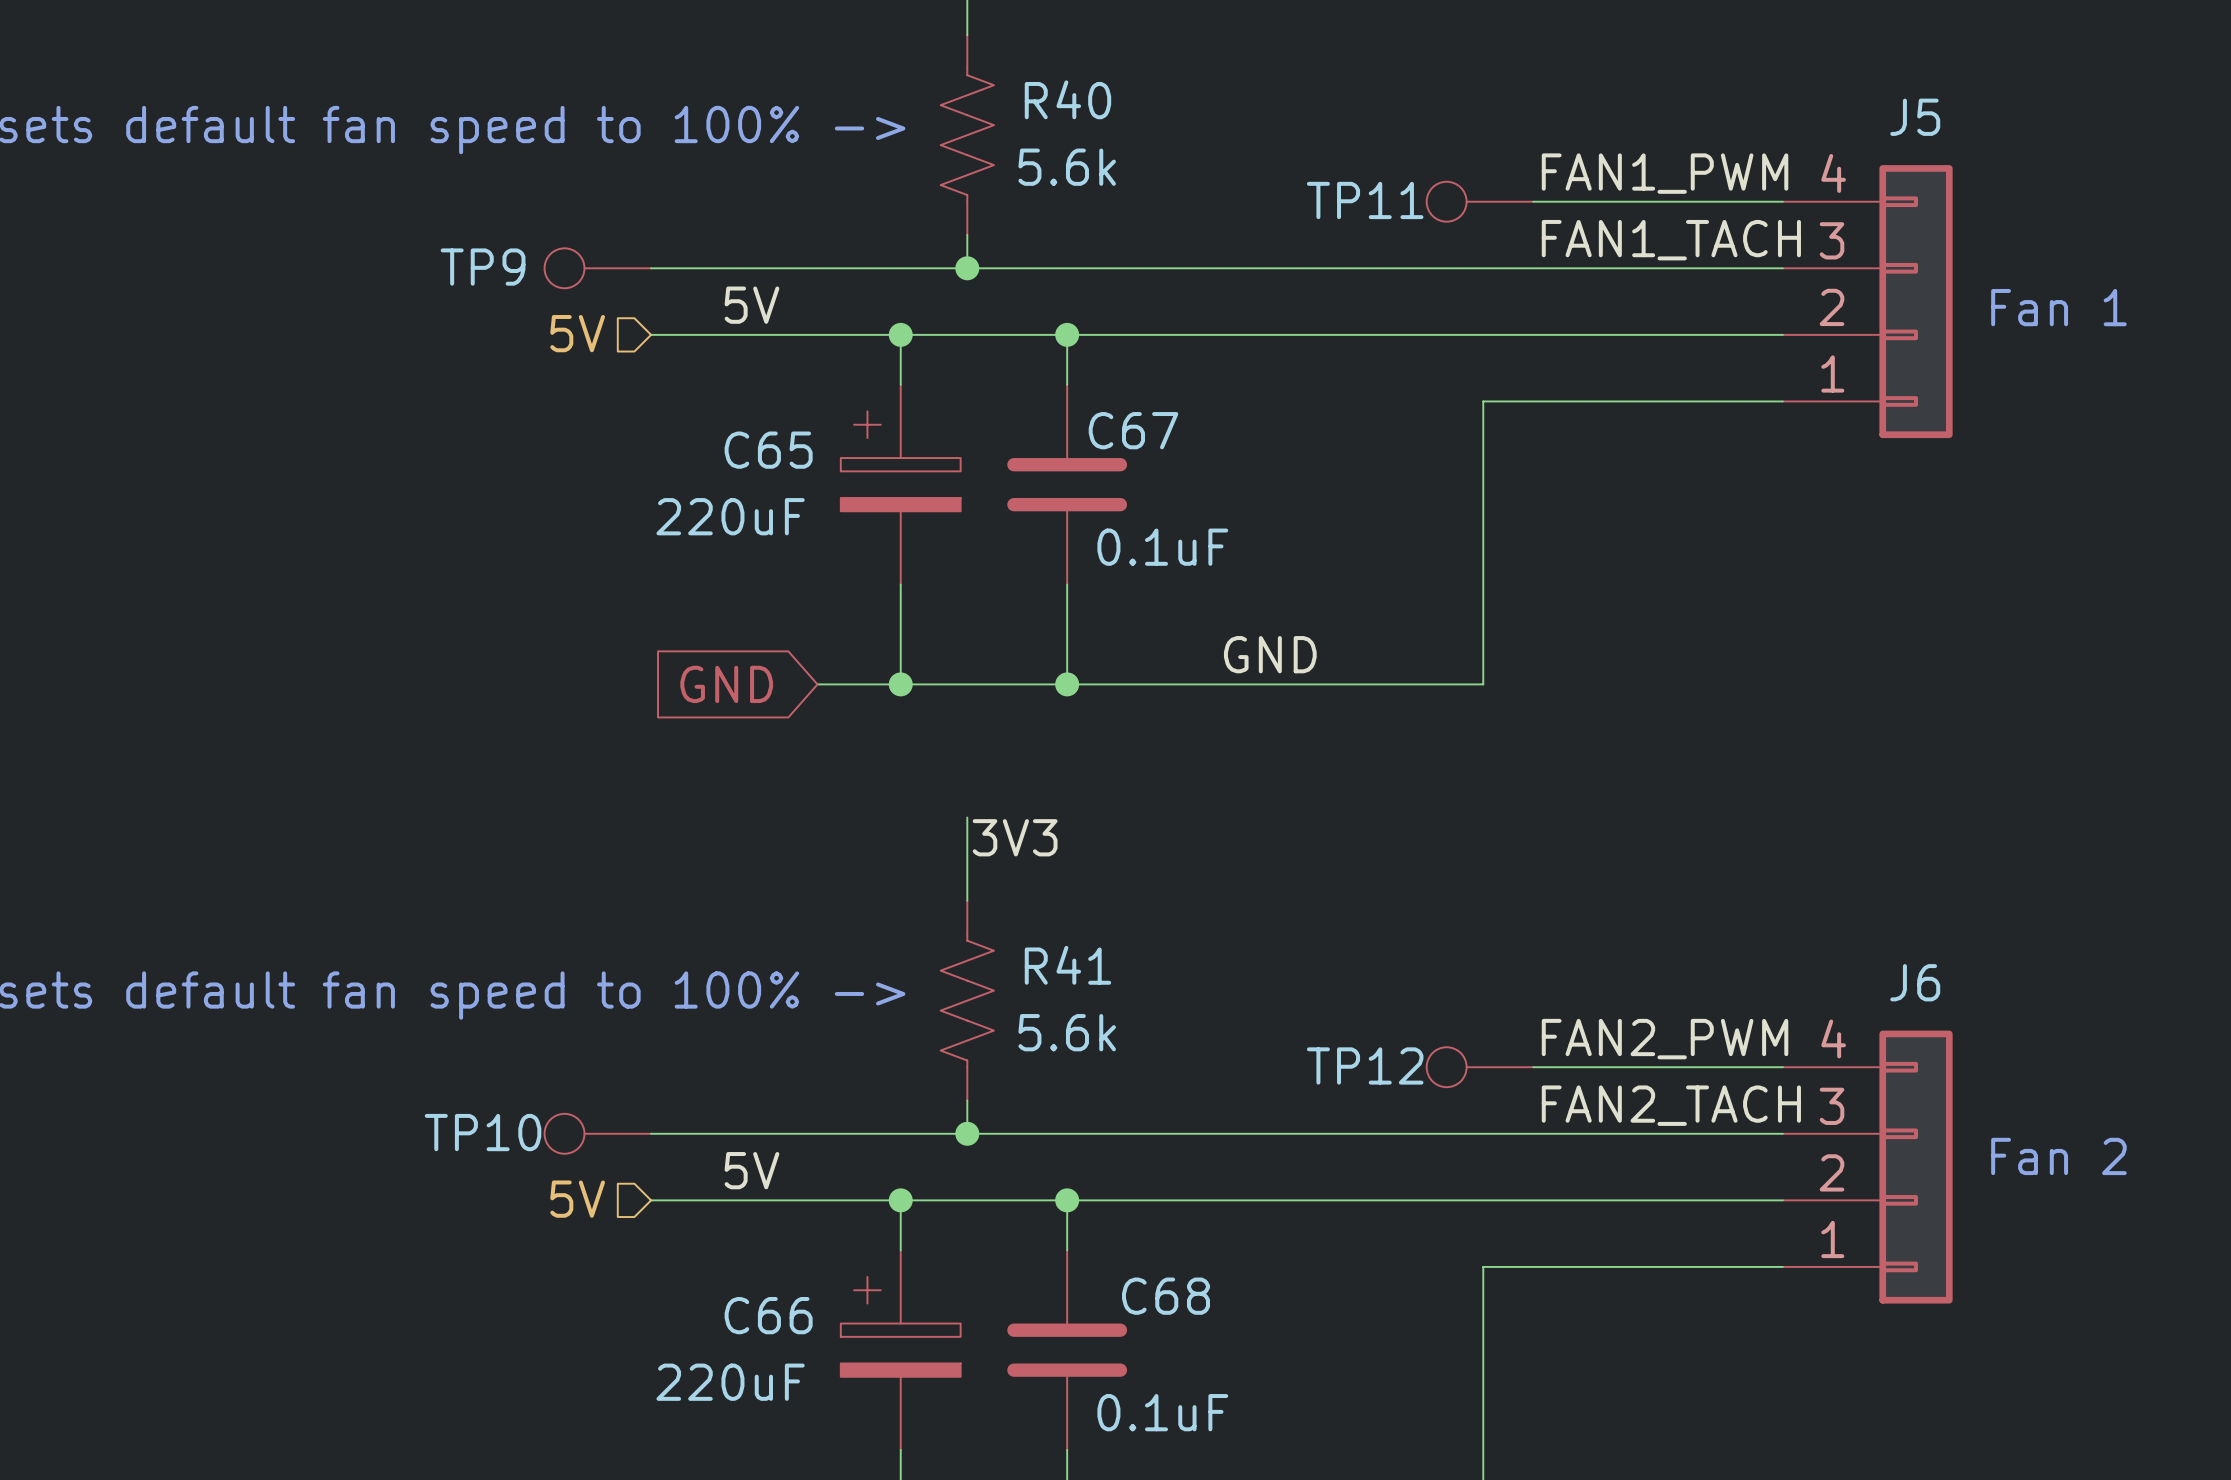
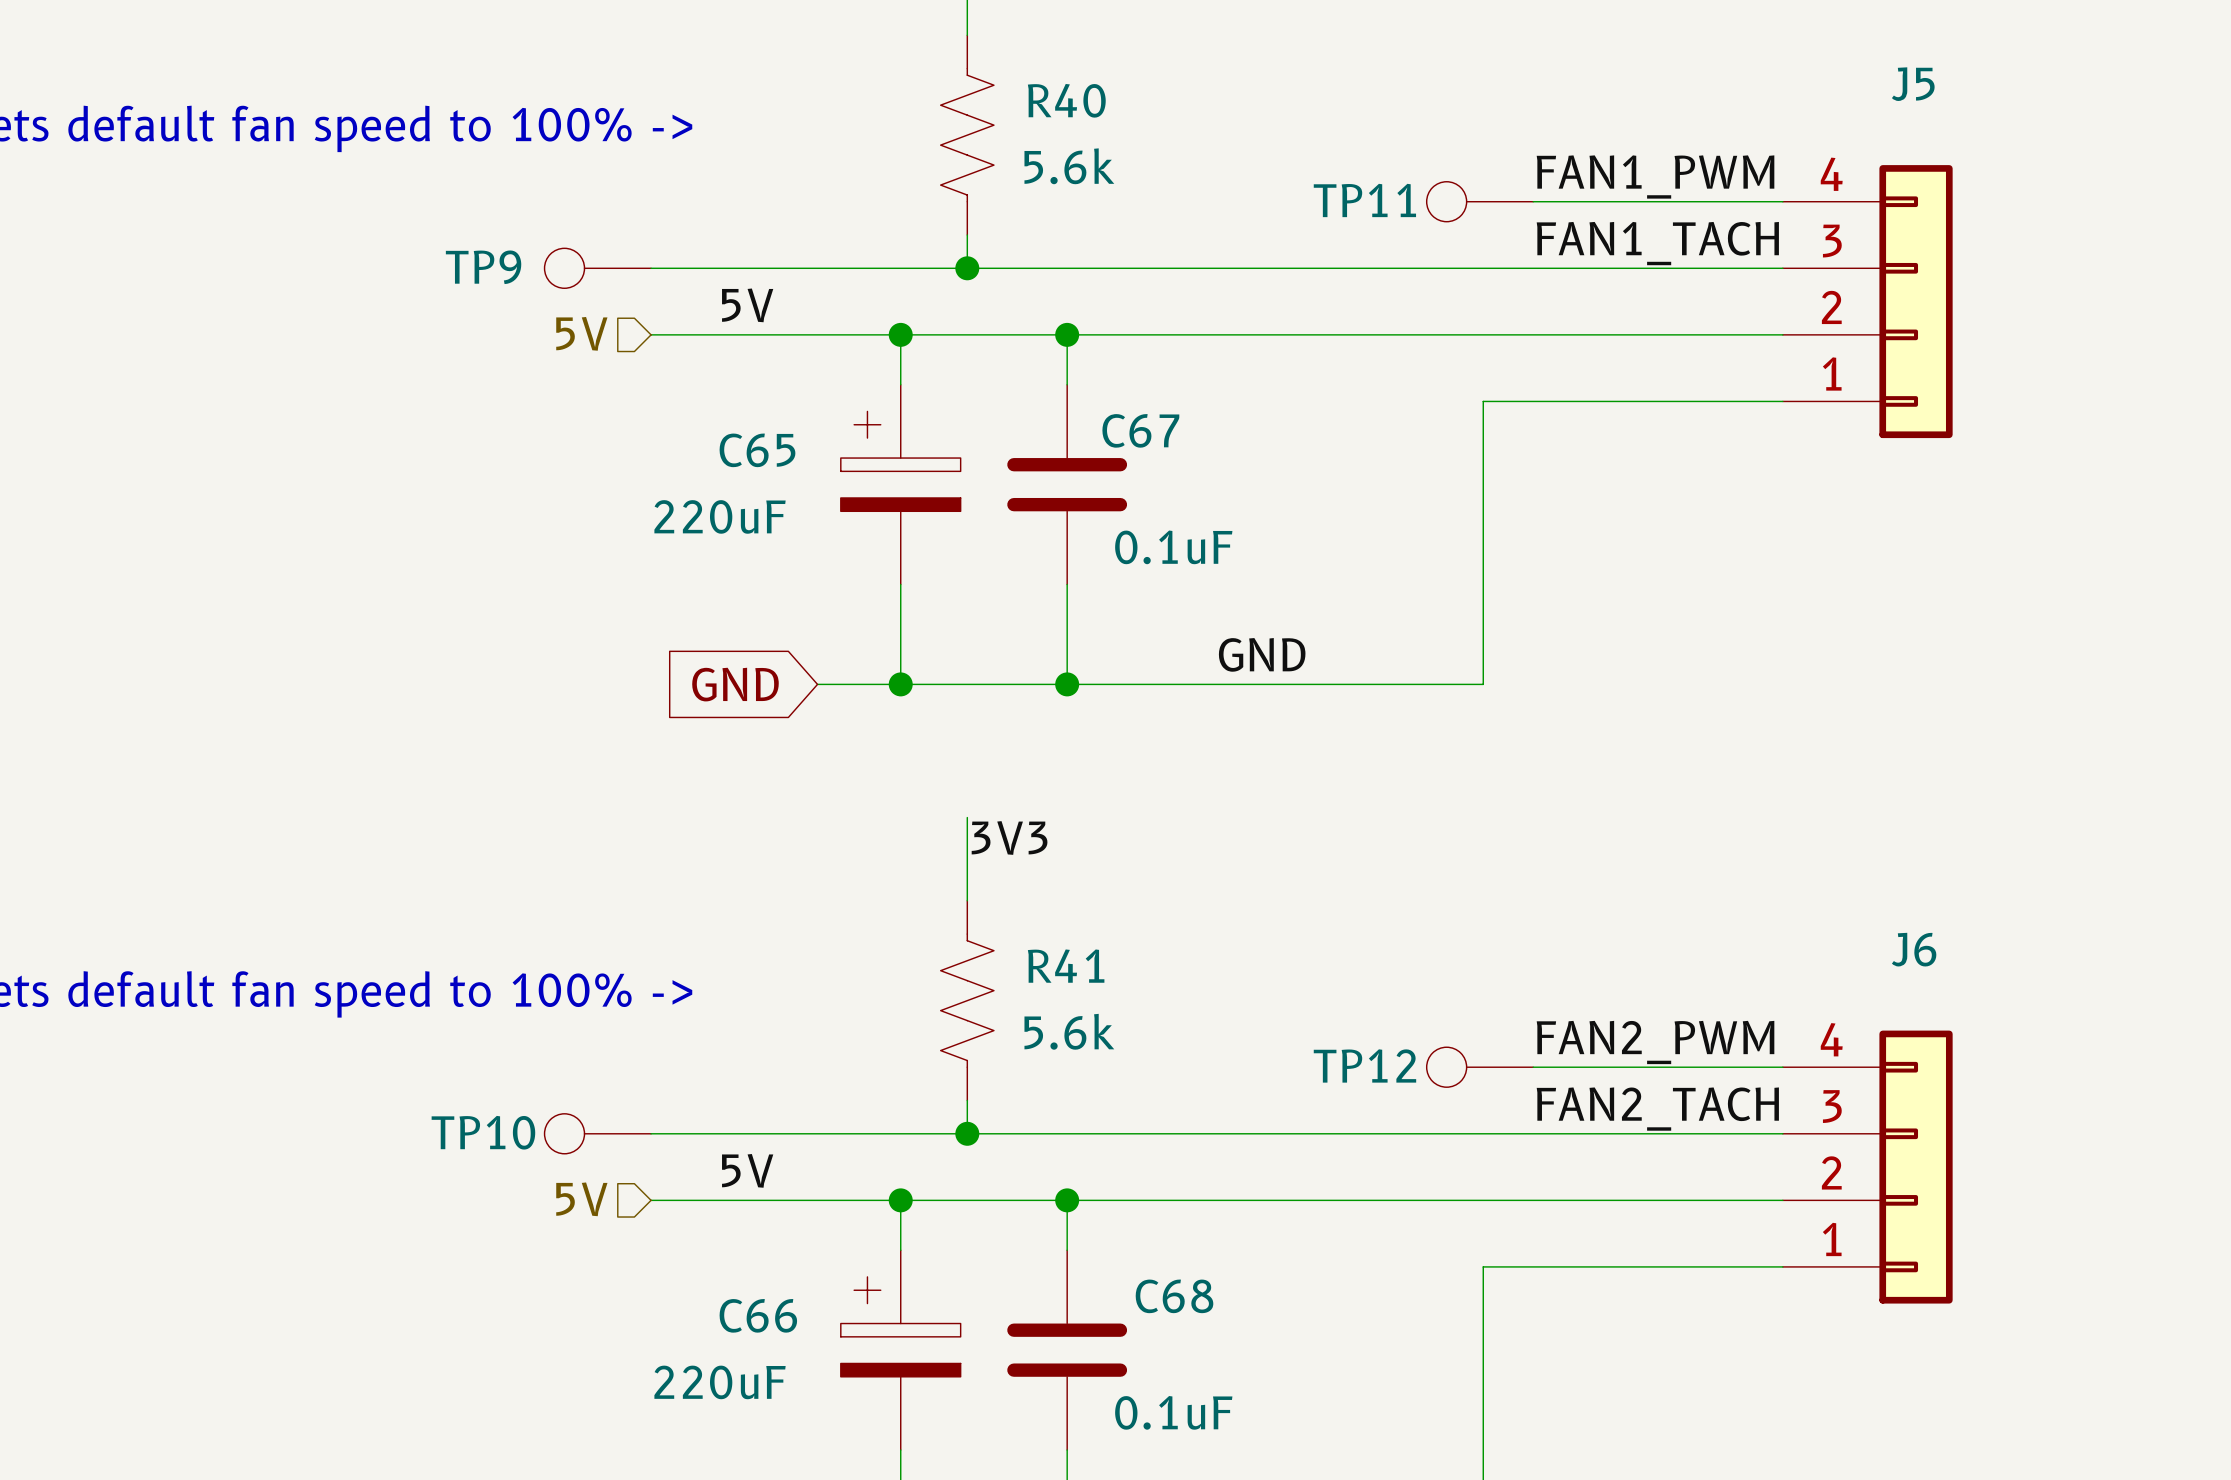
J5 name position: J5 (1915, 117) -> J5 (1913, 84)
text: Fan 1 (2058, 307) -> none
J6 name position: J6 (1915, 982) -> J6 (1914, 949)
text: Fan 2 (2058, 1156) -> none

